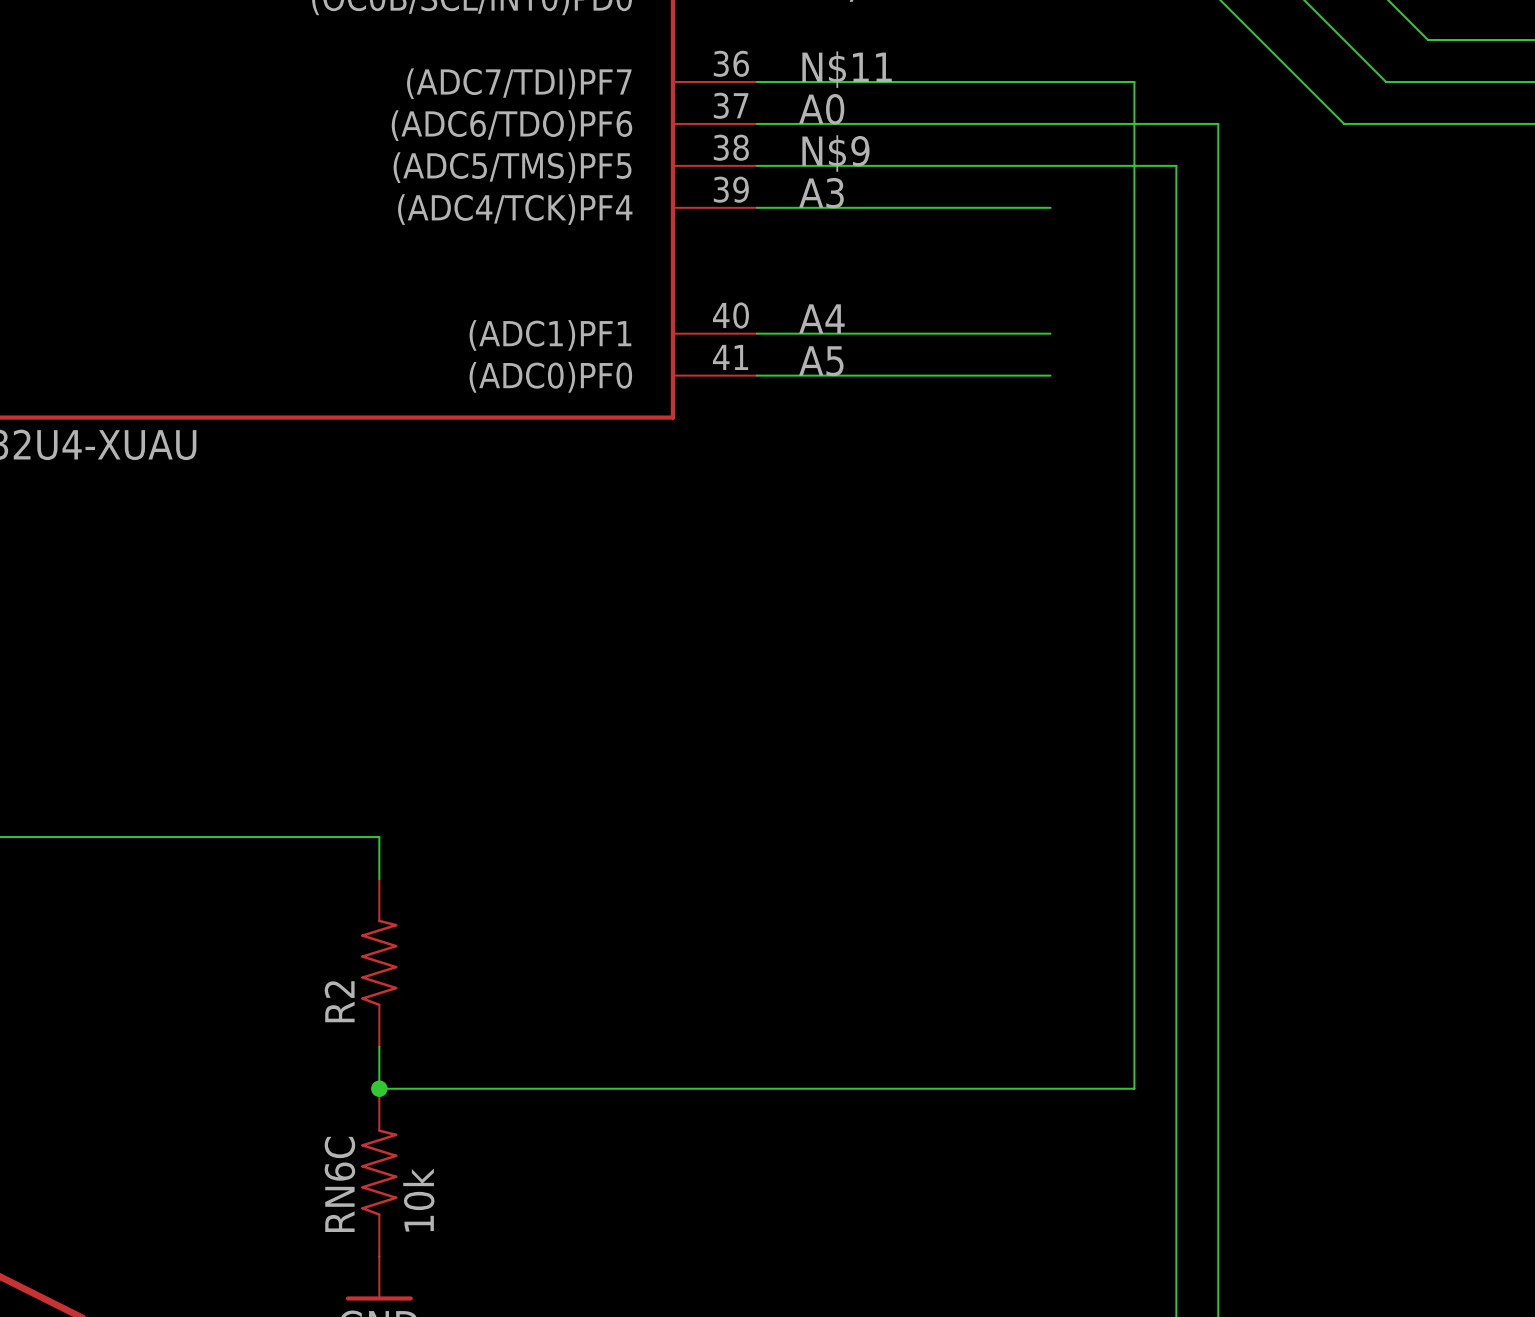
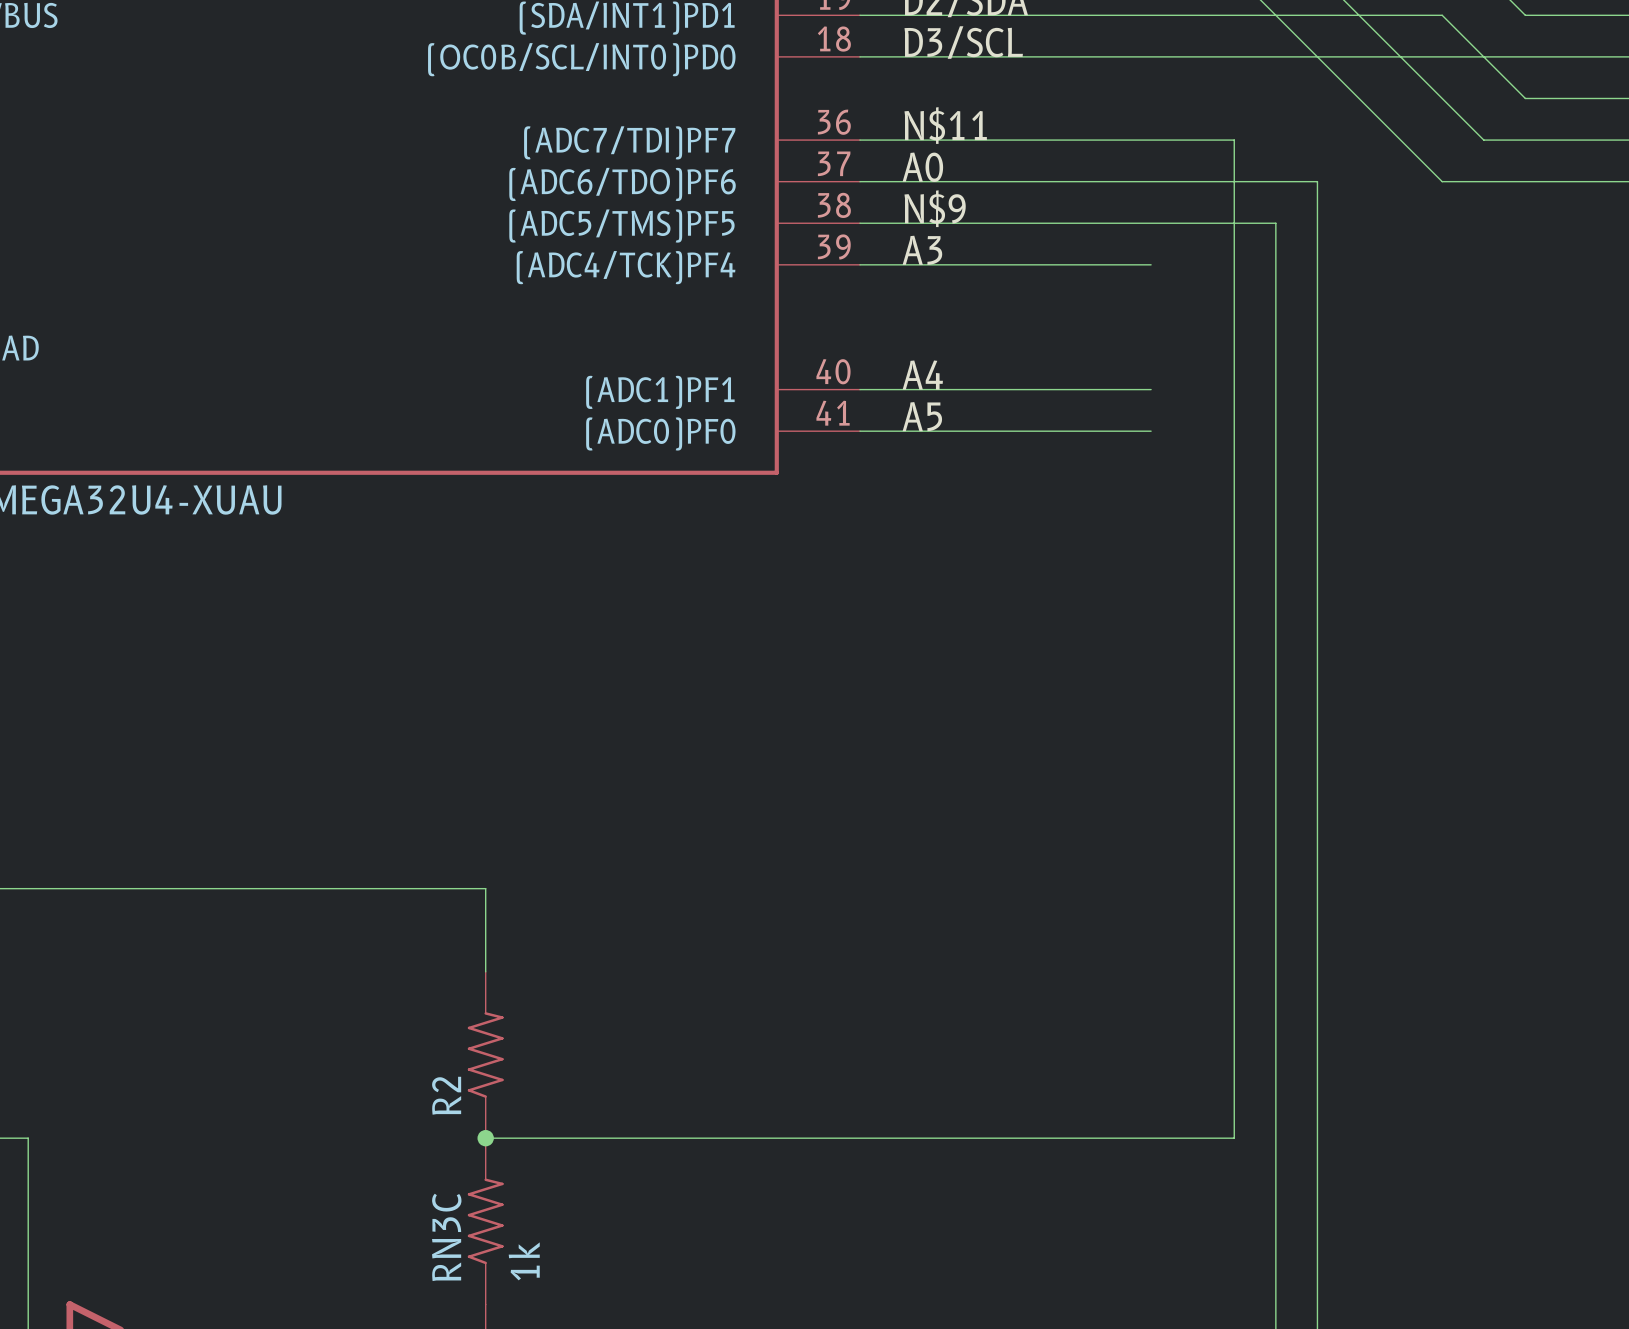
R2 position: (379, 962) -> (485, 1055)
RN6C name: RN6C (339, 1184) -> RN3C (446, 1237)
RN6C value: 10k (418, 1200) -> 1k (524, 1261)

